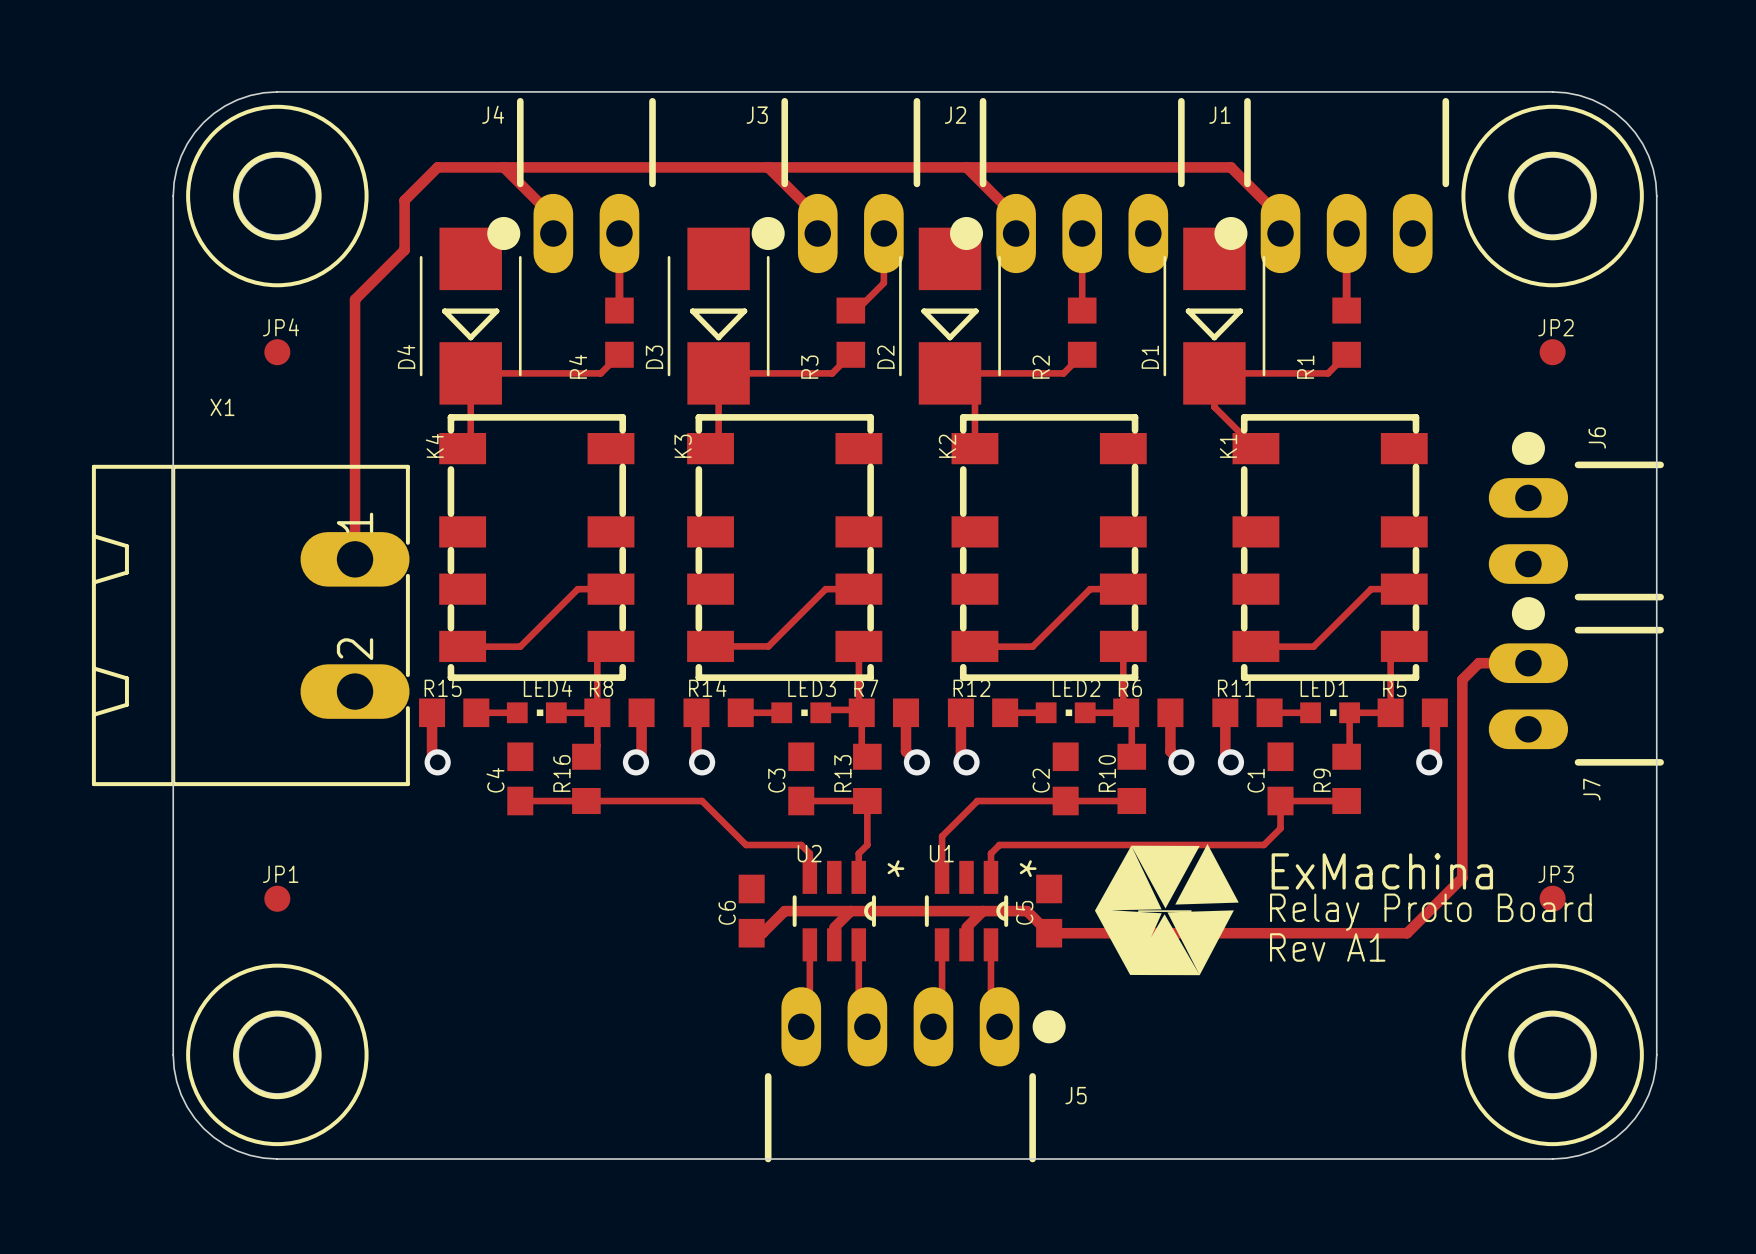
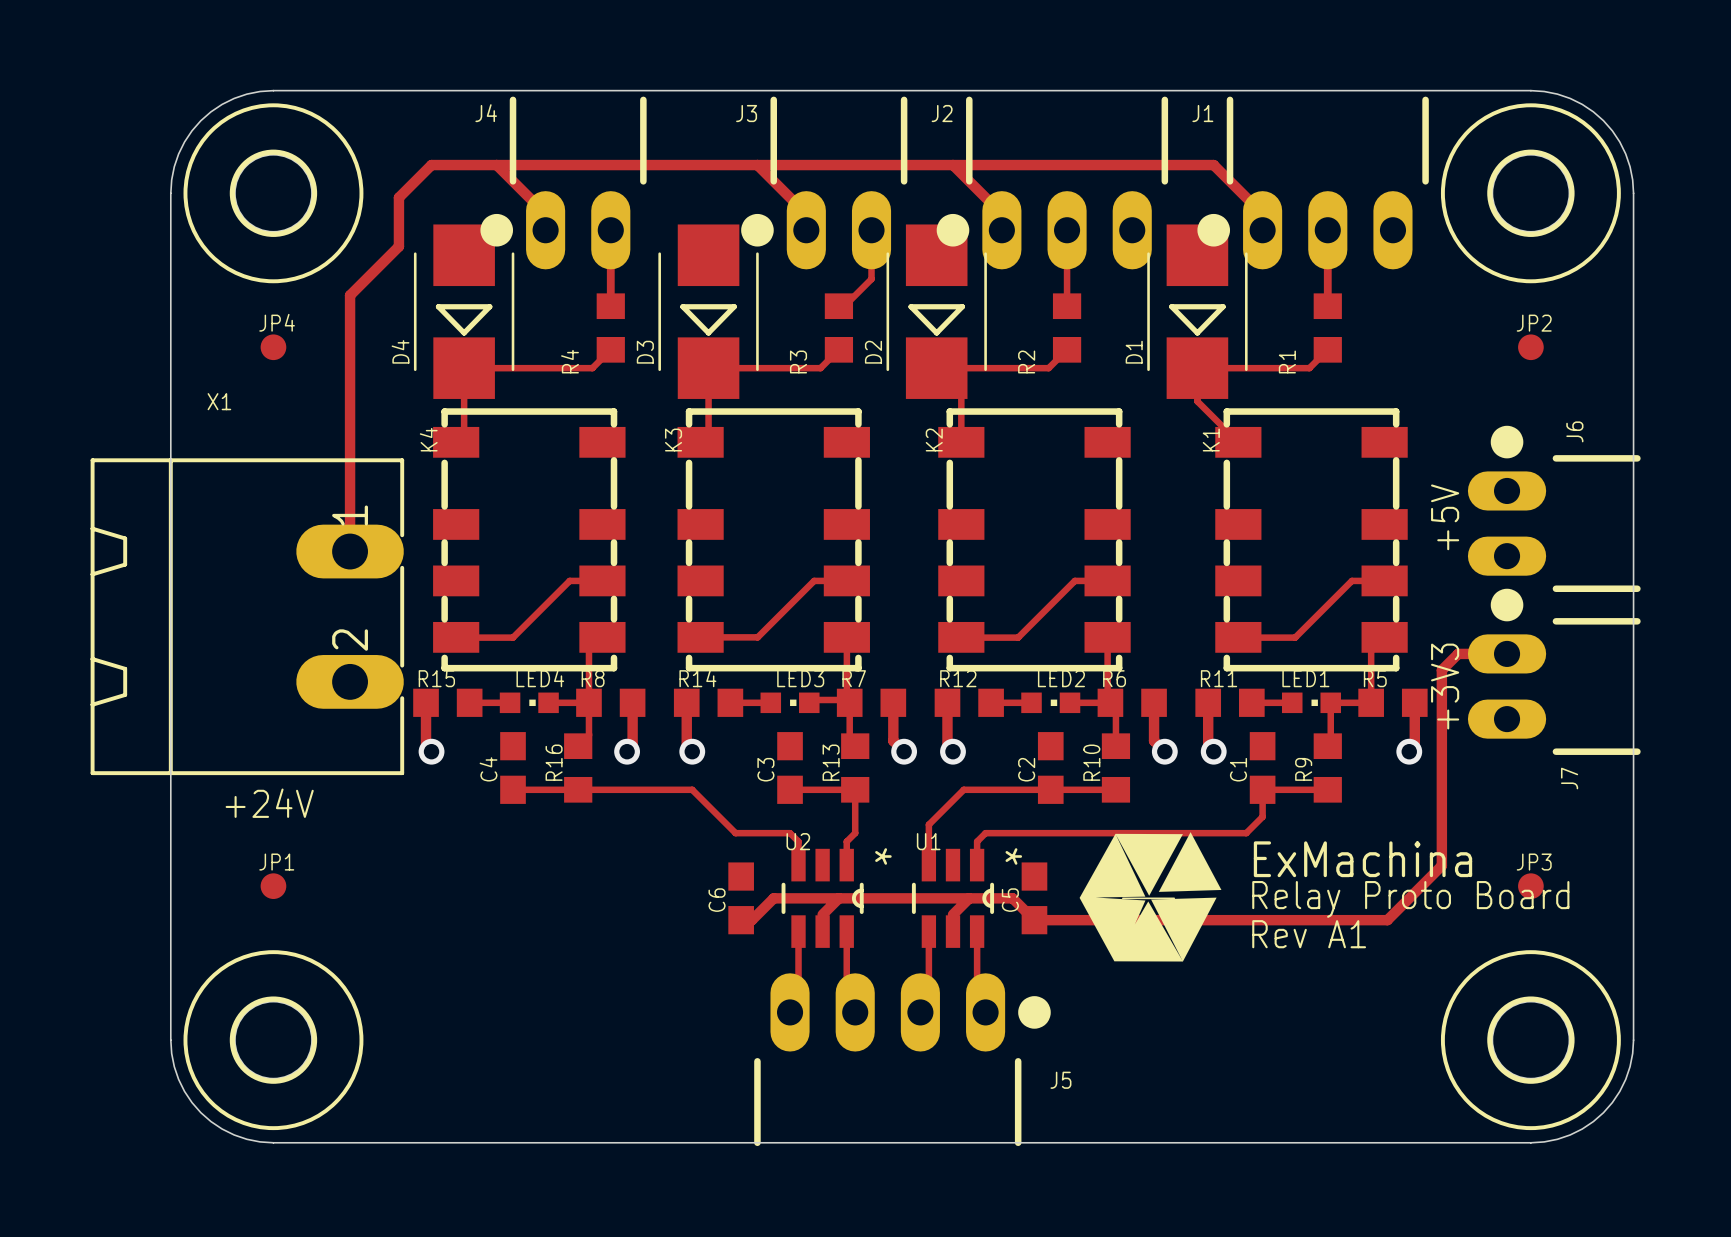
text: none -> +5V (1445, 517)
text: none -> +3V3 (1445, 686)
text: none -> +24V (269, 803)

